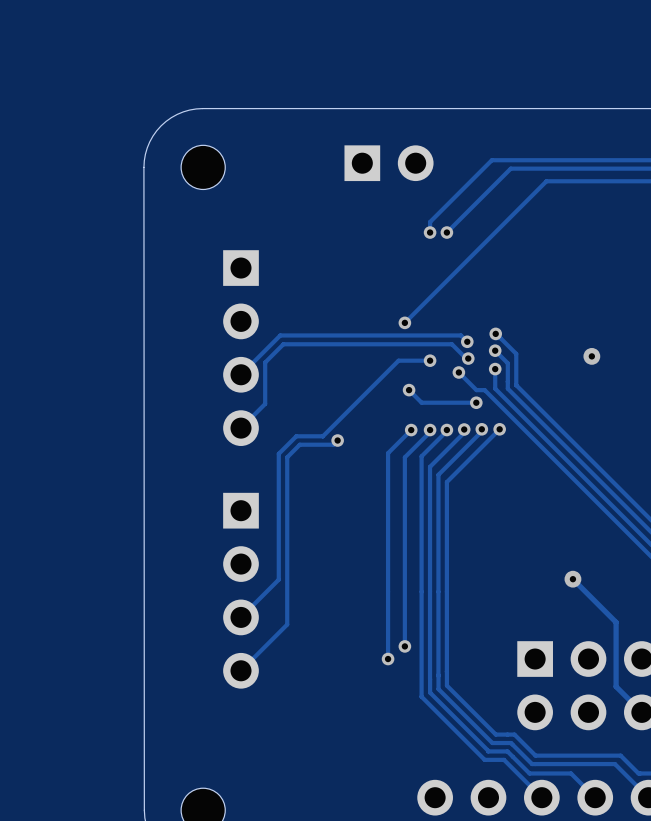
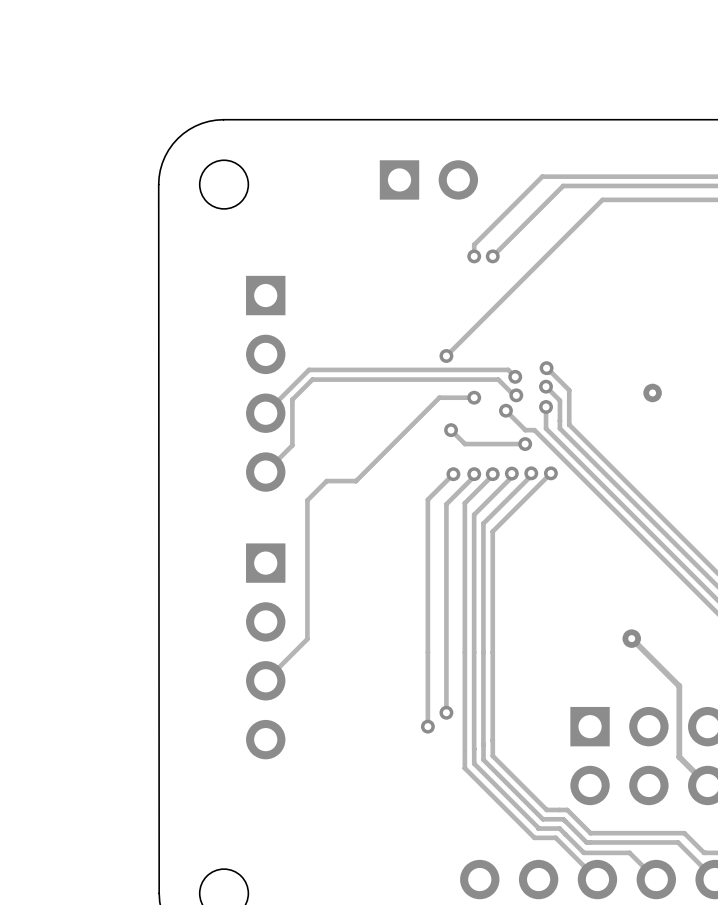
track: (337, 440) (333, 444) (299, 444) (287, 457) (287, 624) (241, 670) -> none
via: (337, 440) -> none

